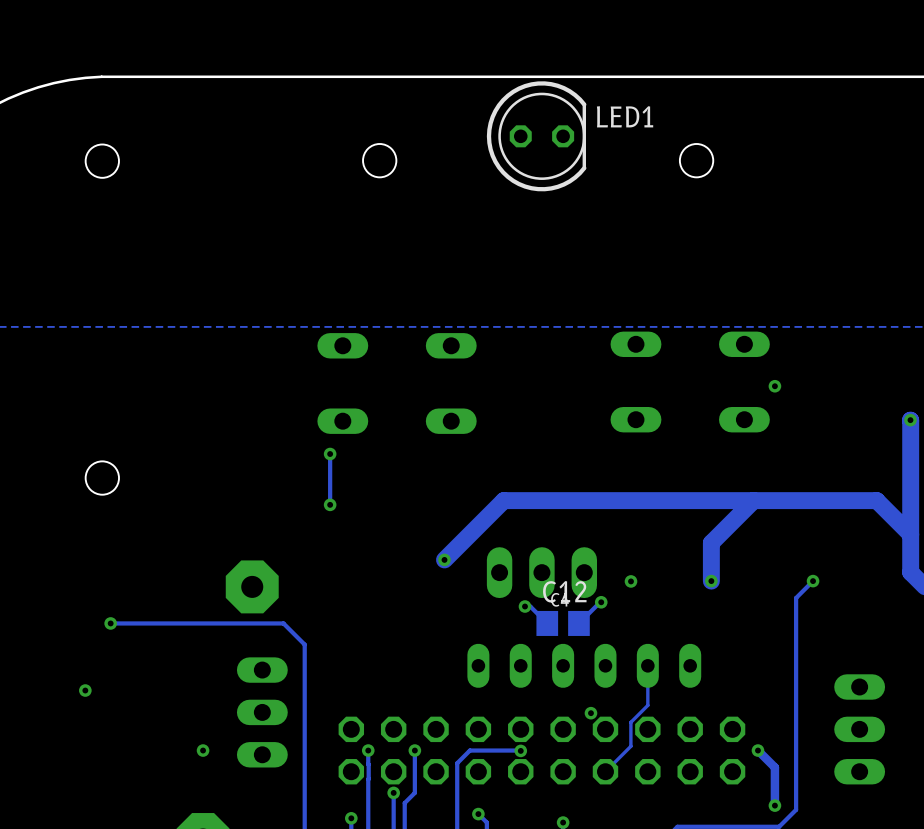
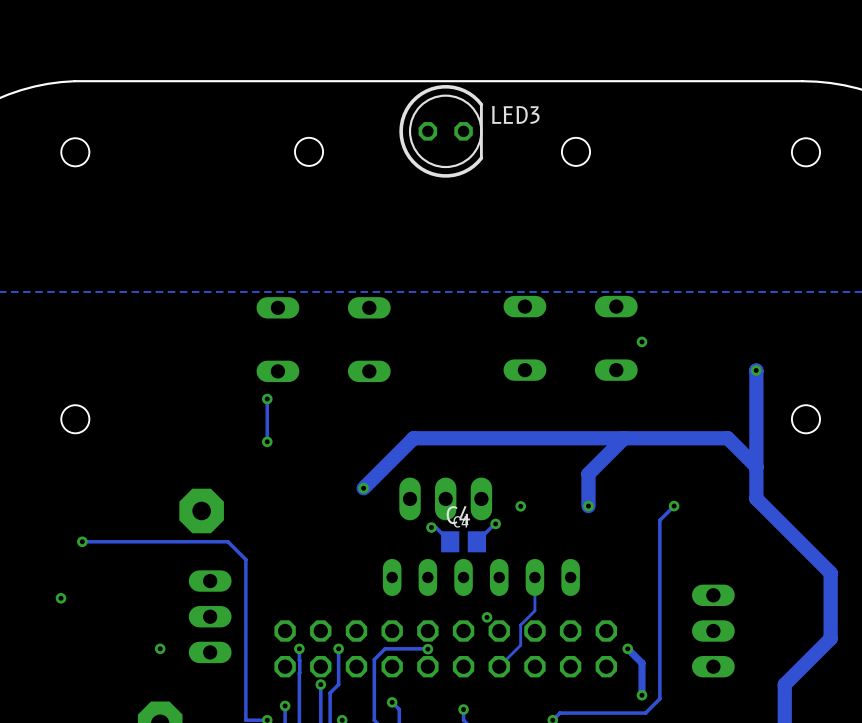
LED1 name: LED1 (625, 116) -> LED3 (515, 114)
C12 name: C12 (564, 591) -> C4 (458, 515)

